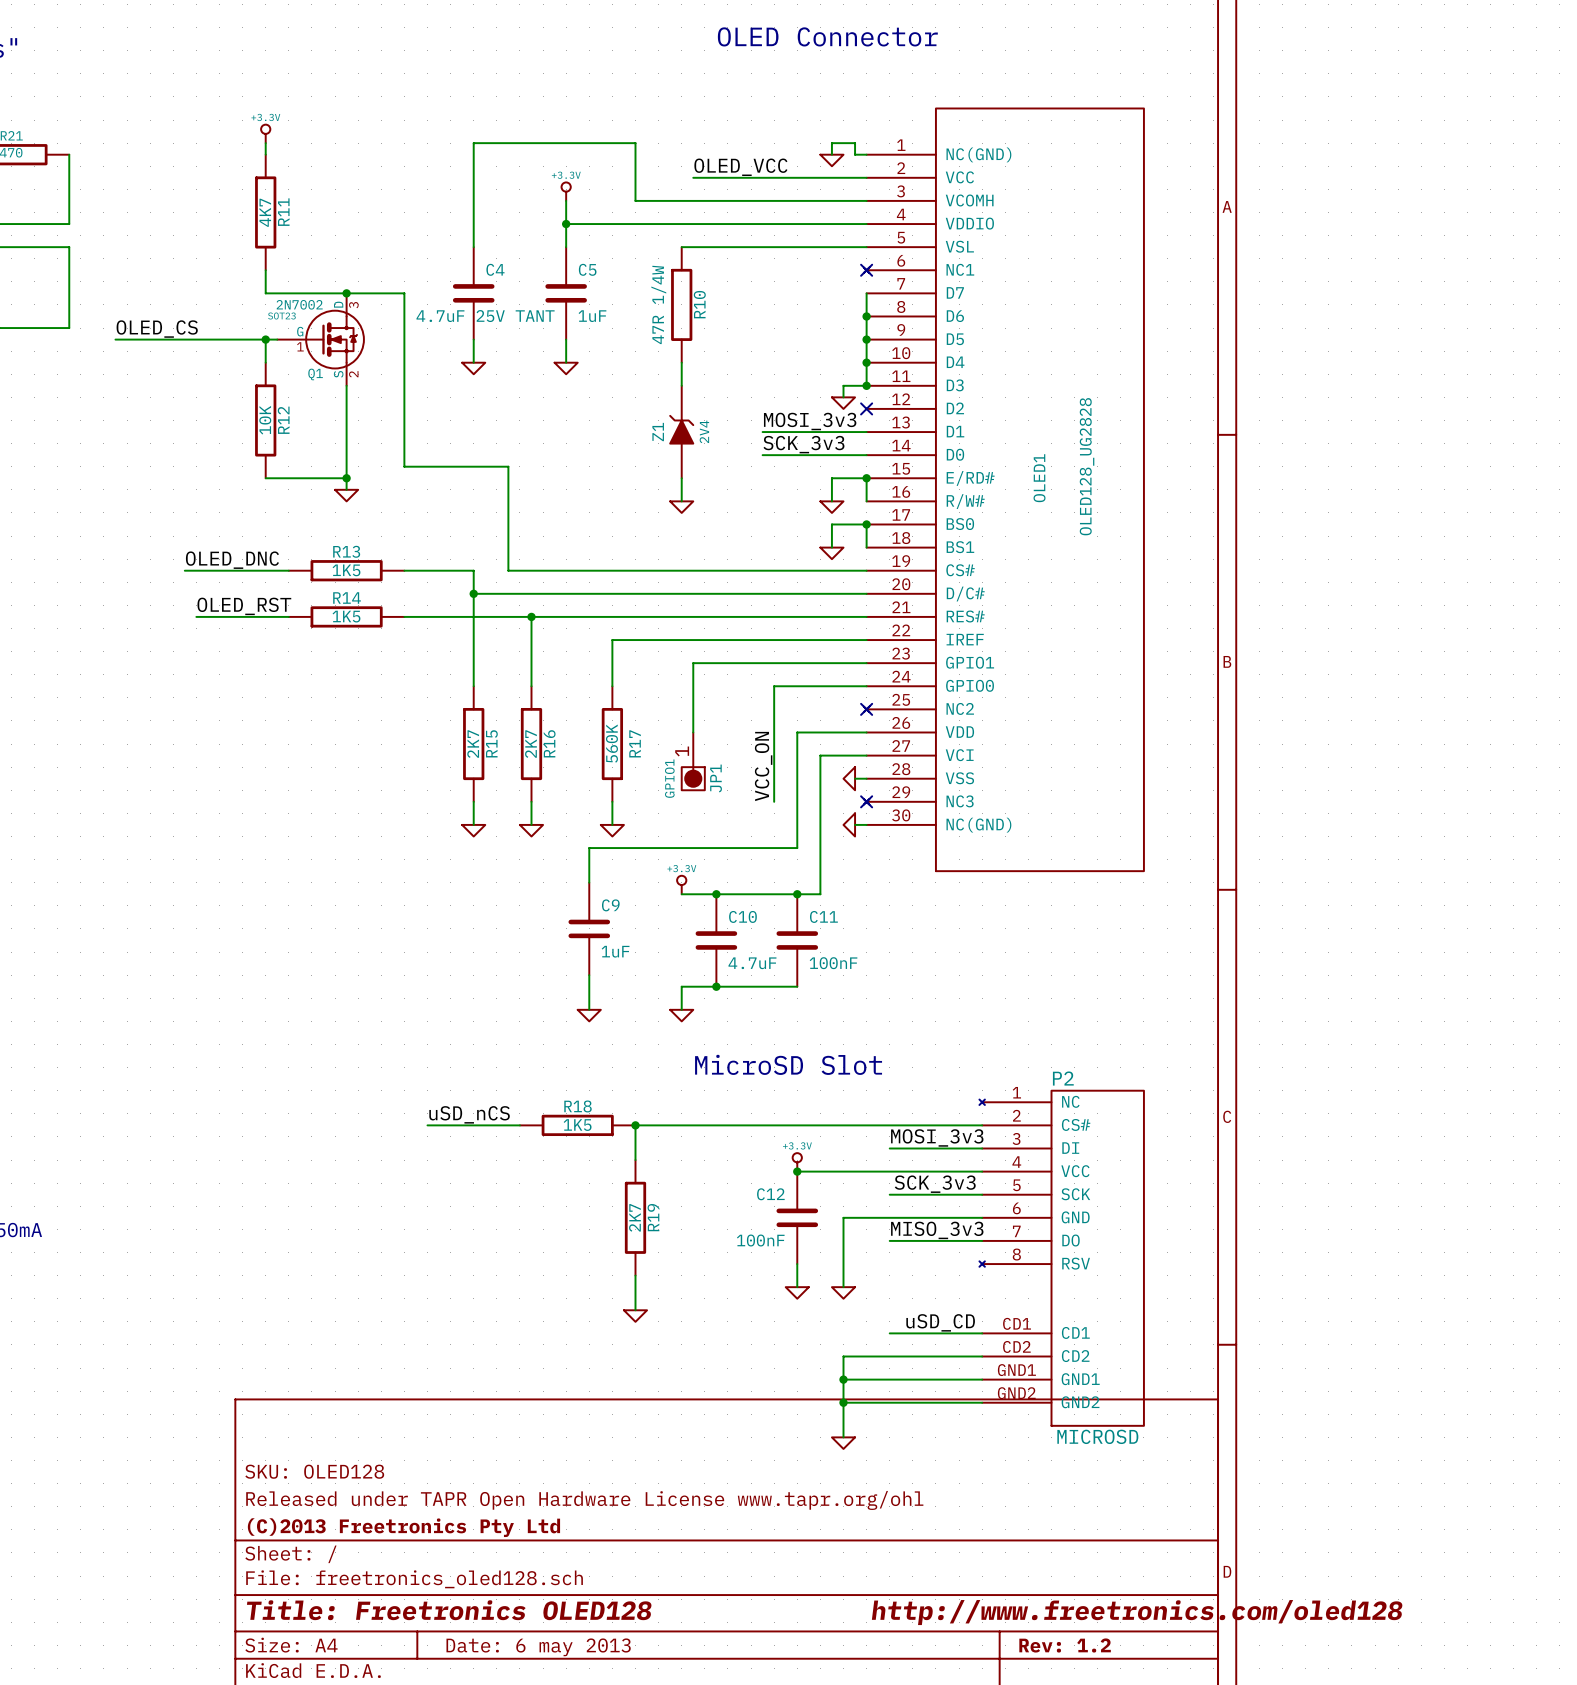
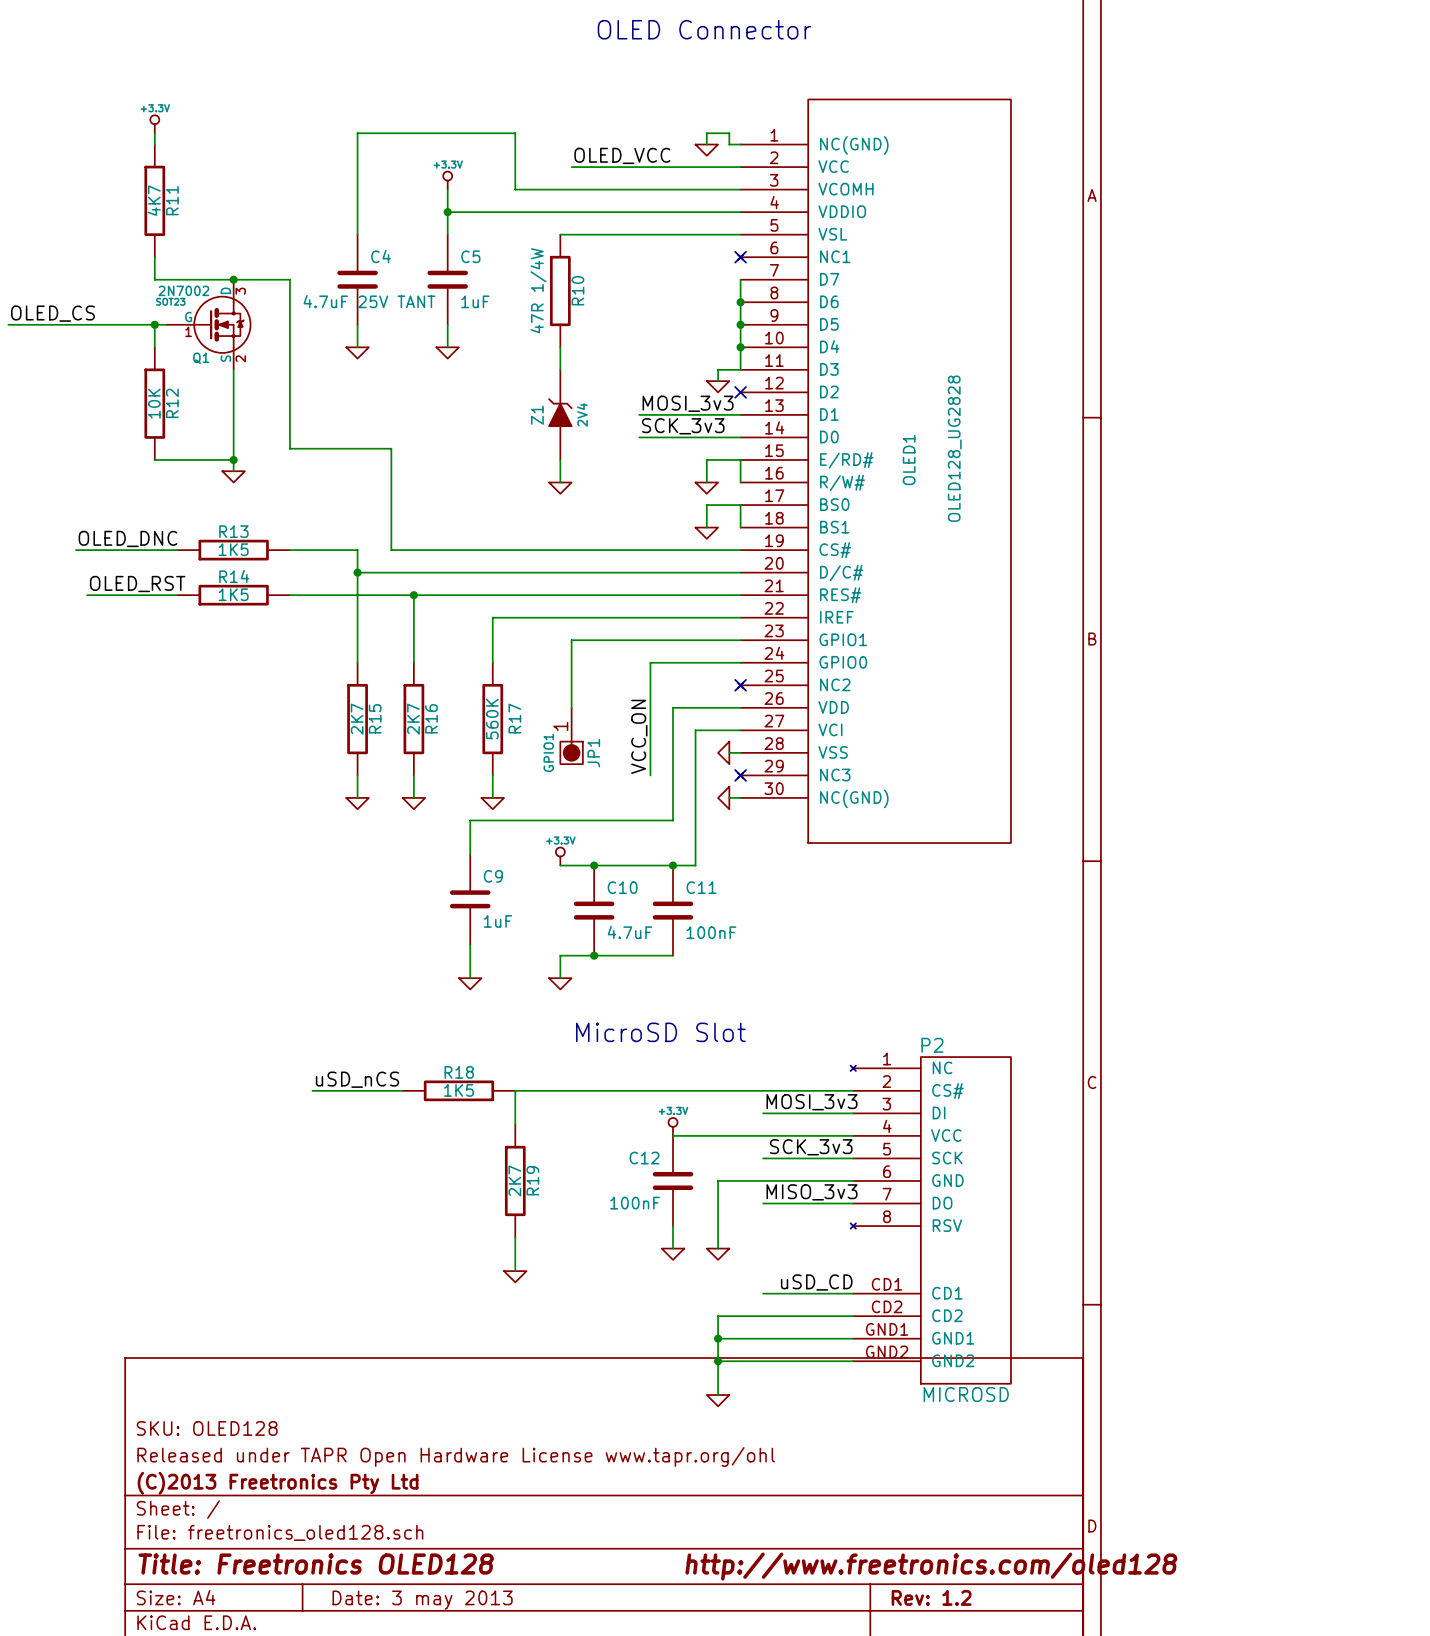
junction: (866, 385) -> none
junction: (866, 478) -> none
junction: (866, 524) -> none
junction: (635, 1125) -> none
junction: (797, 1171) -> none
title block: Date: 6 may 2013 (538, 1647) -> Date: 3 may 2013 (422, 1600)

